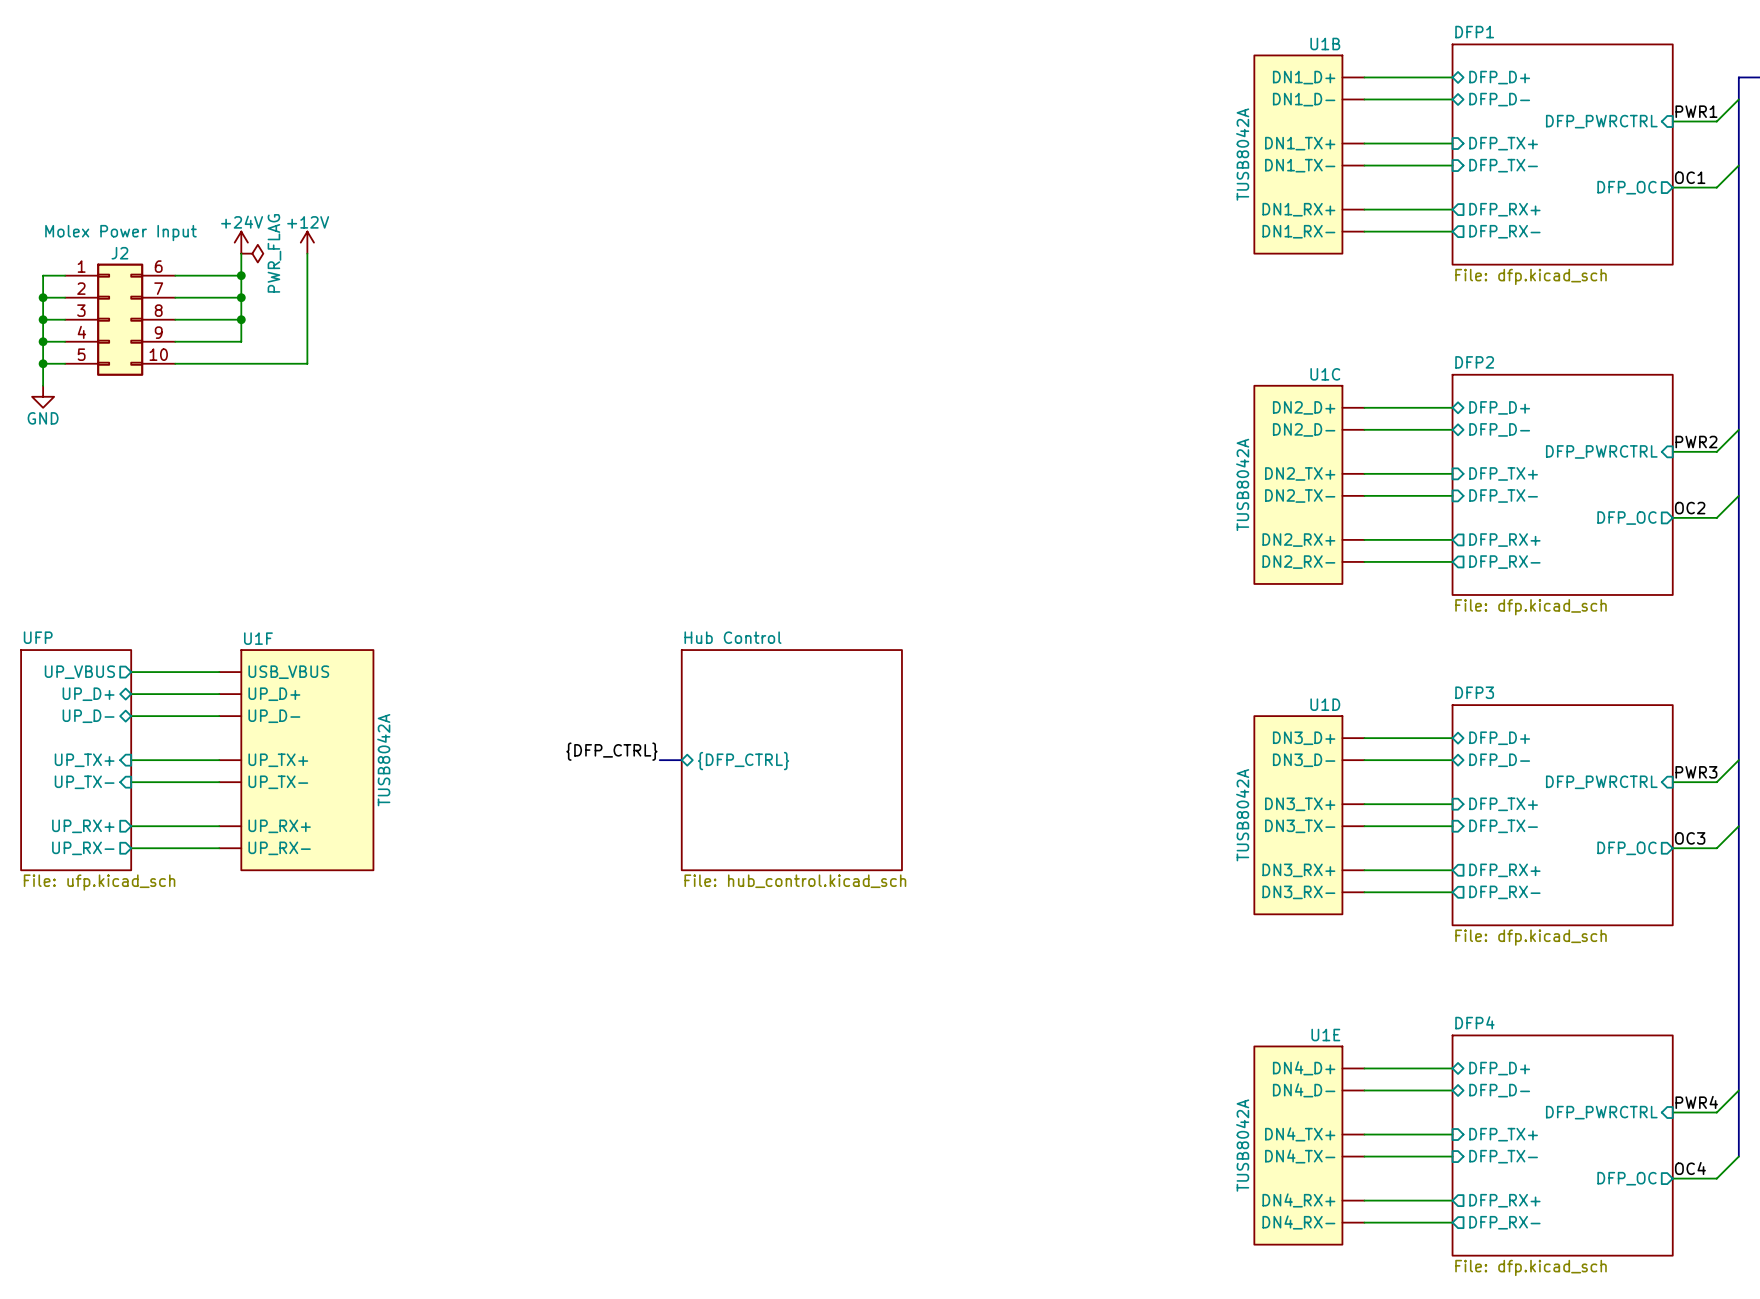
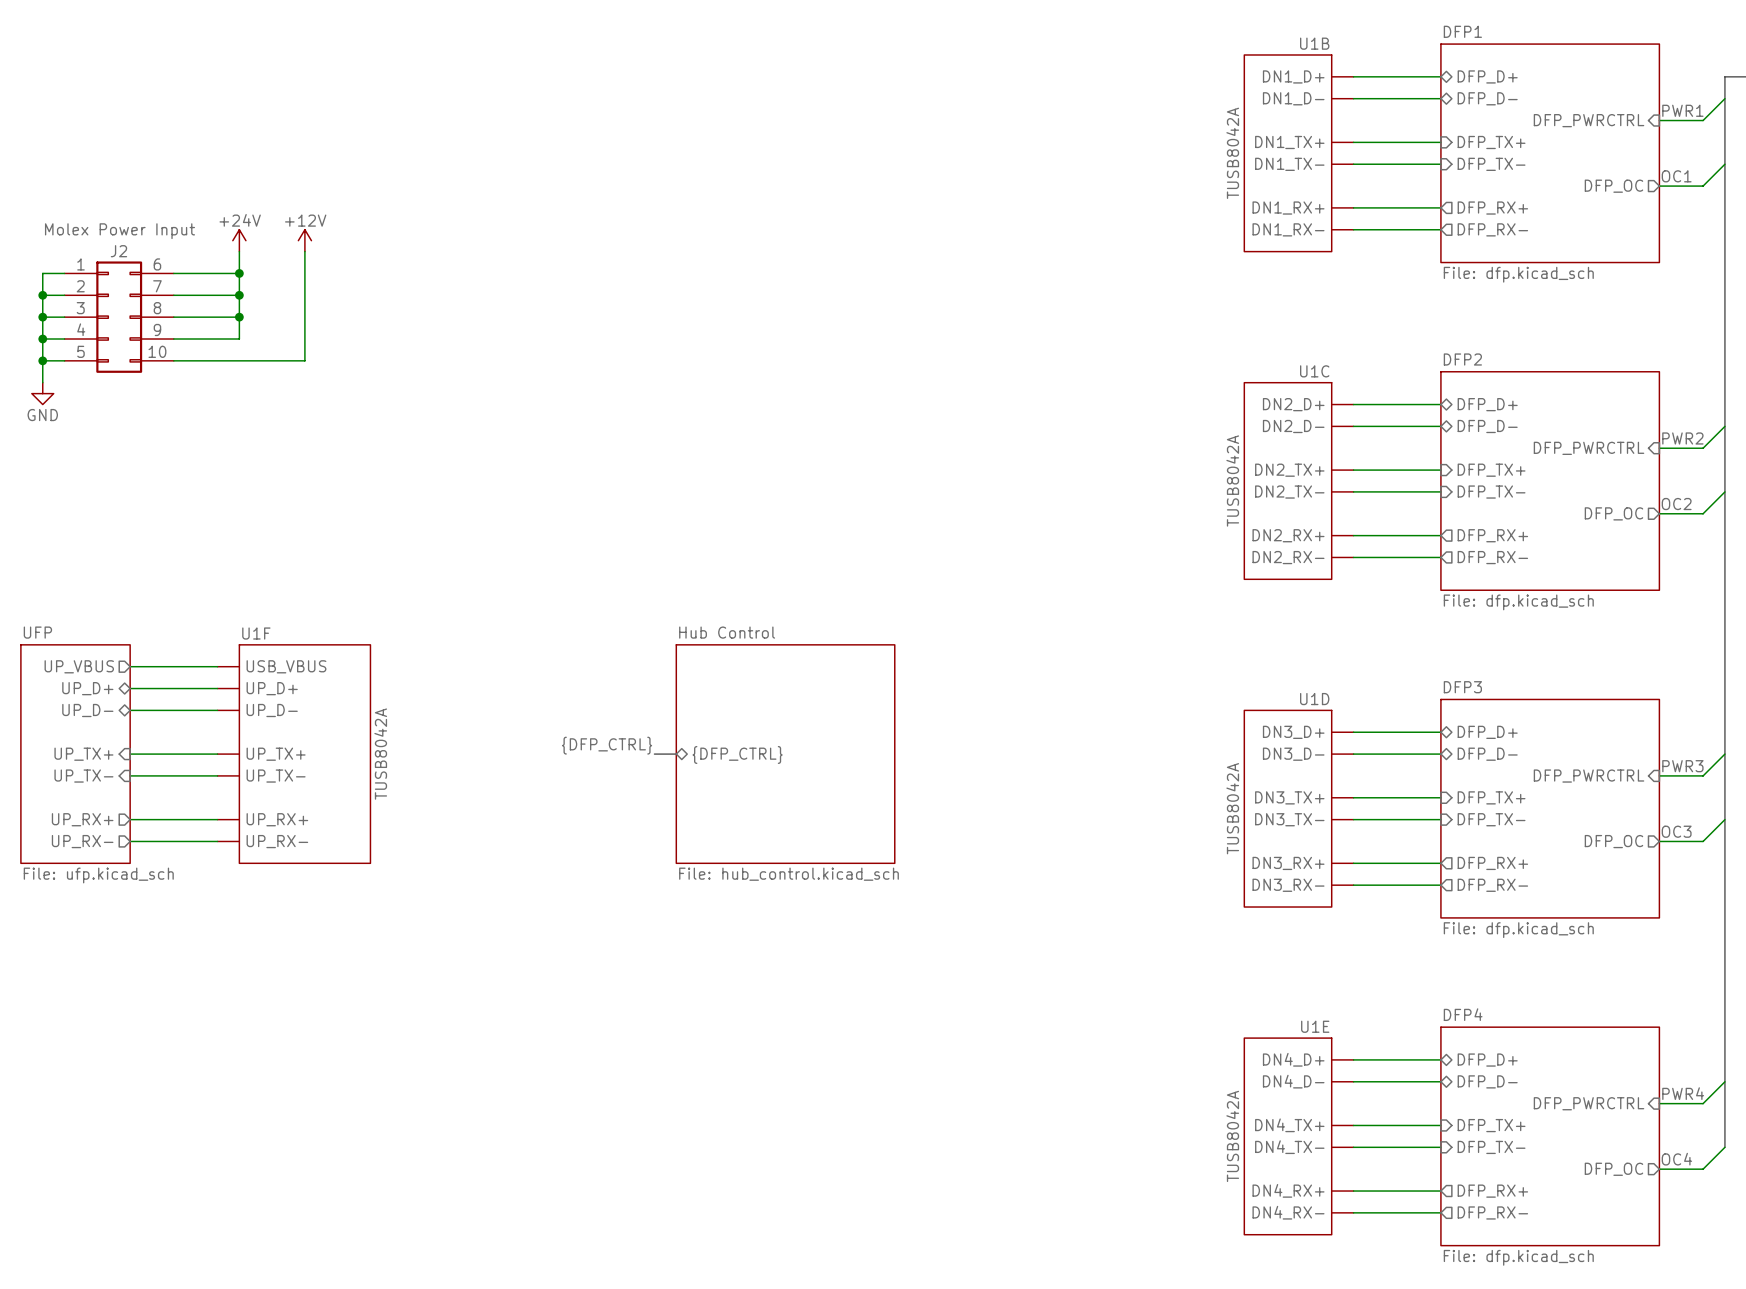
power symbol: PWR_FLAG (252, 253) -> none

